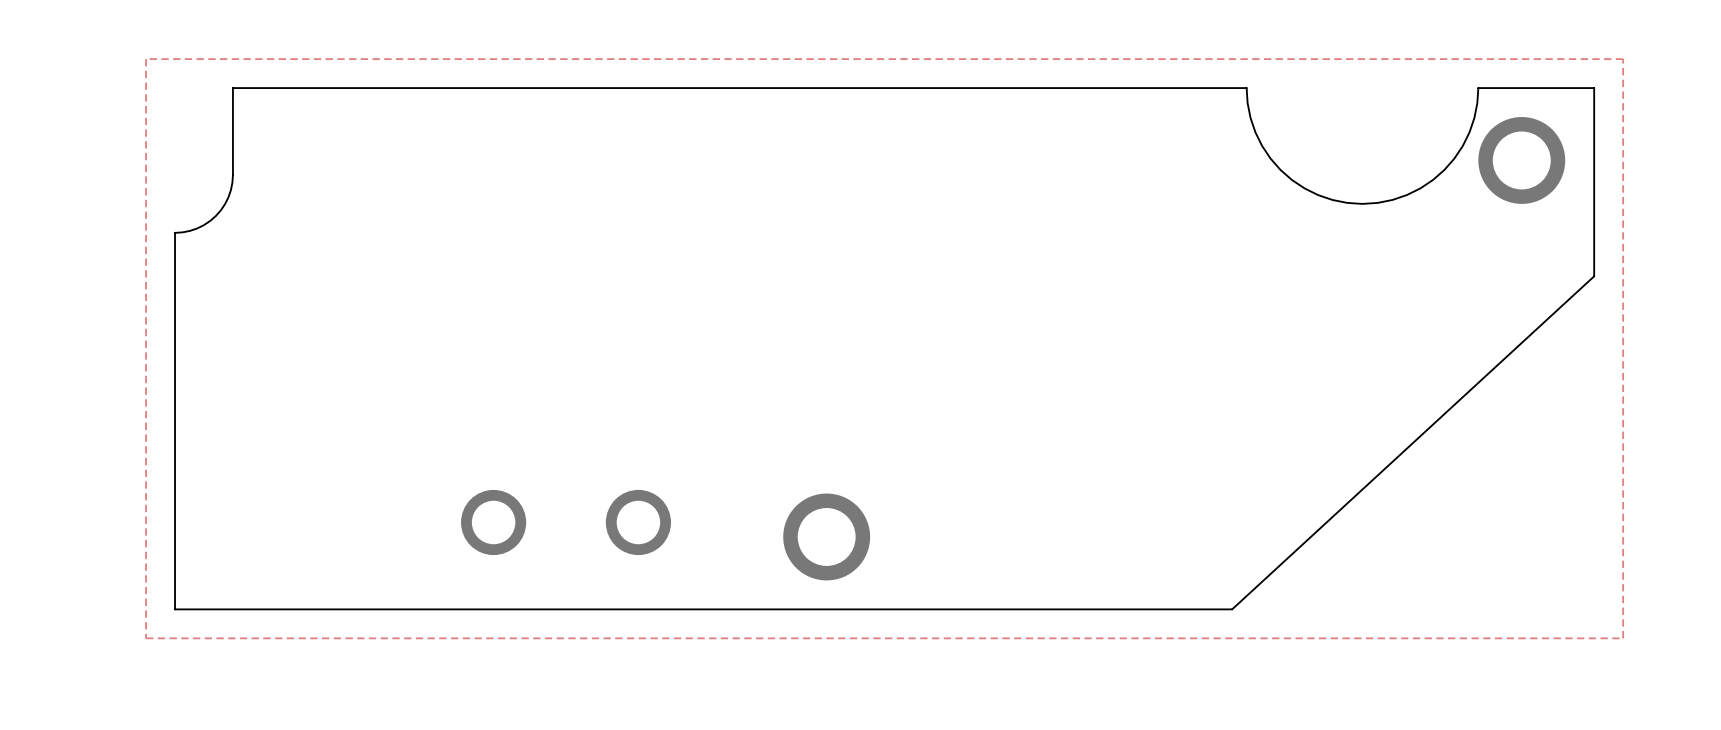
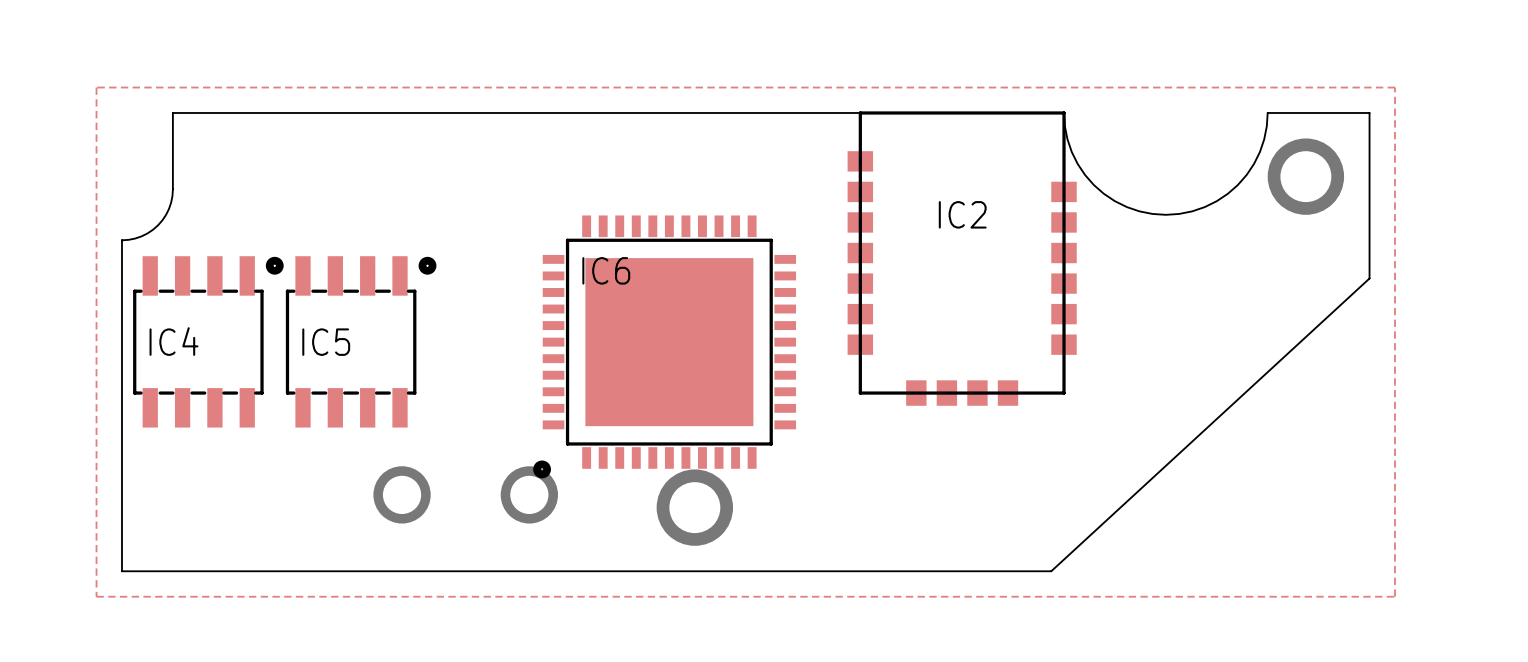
IC2: none -> (962, 258)
IC4: none -> (208, 341)
IC5: none -> (361, 341)
IC6: none -> (664, 346)

